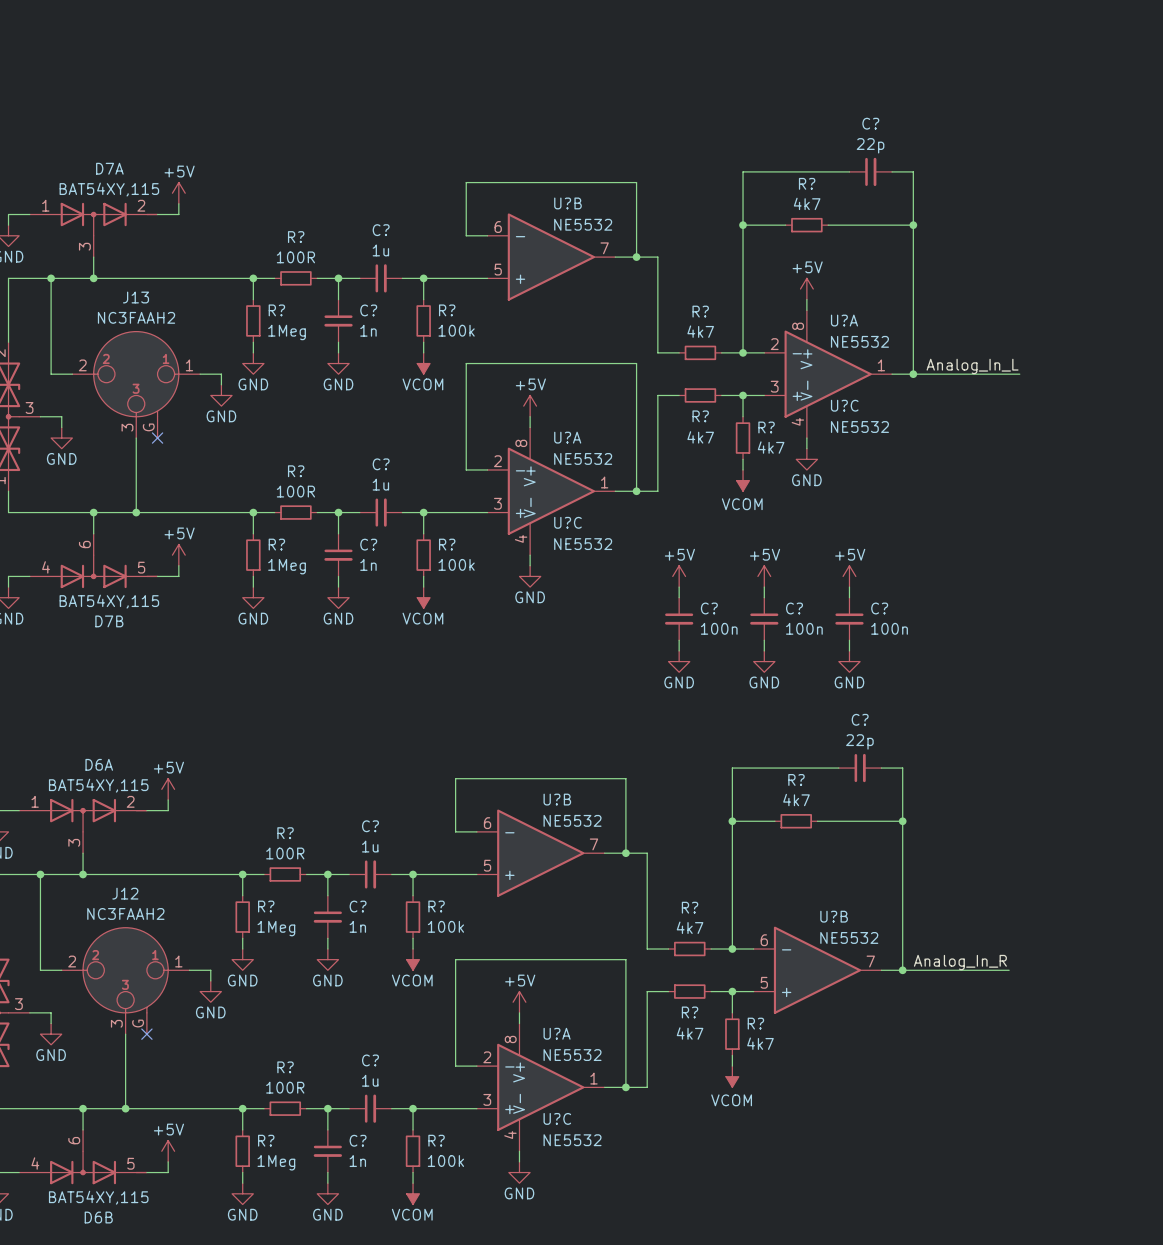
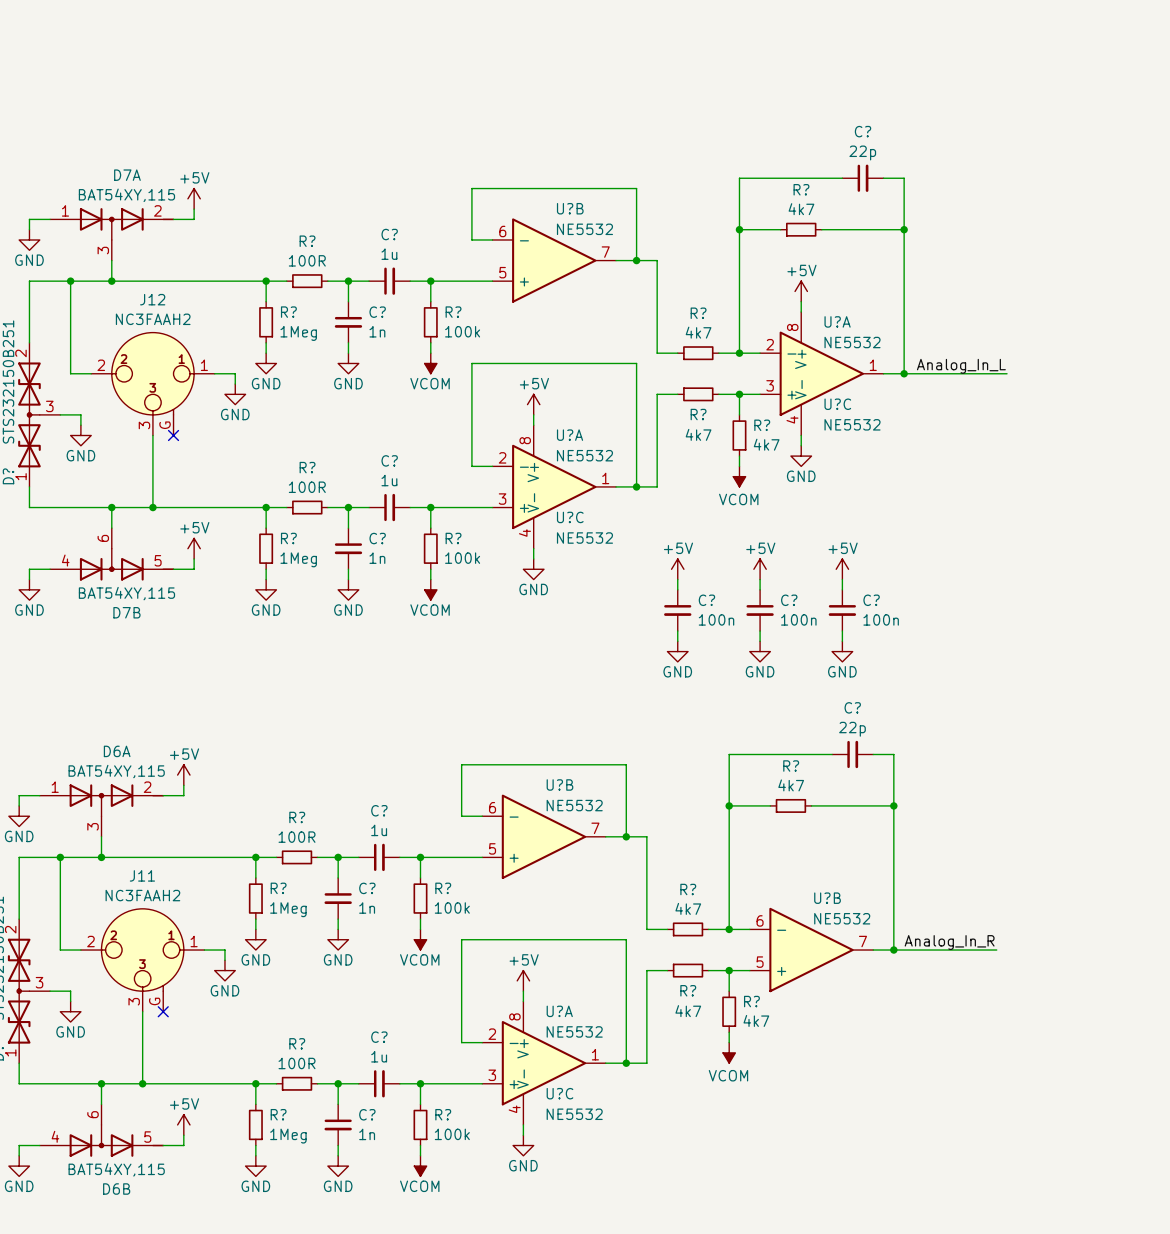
J13 name: J13 (136, 297) -> J12 (152, 299)
J12 name: J12 (125, 893) -> J11 (142, 875)

